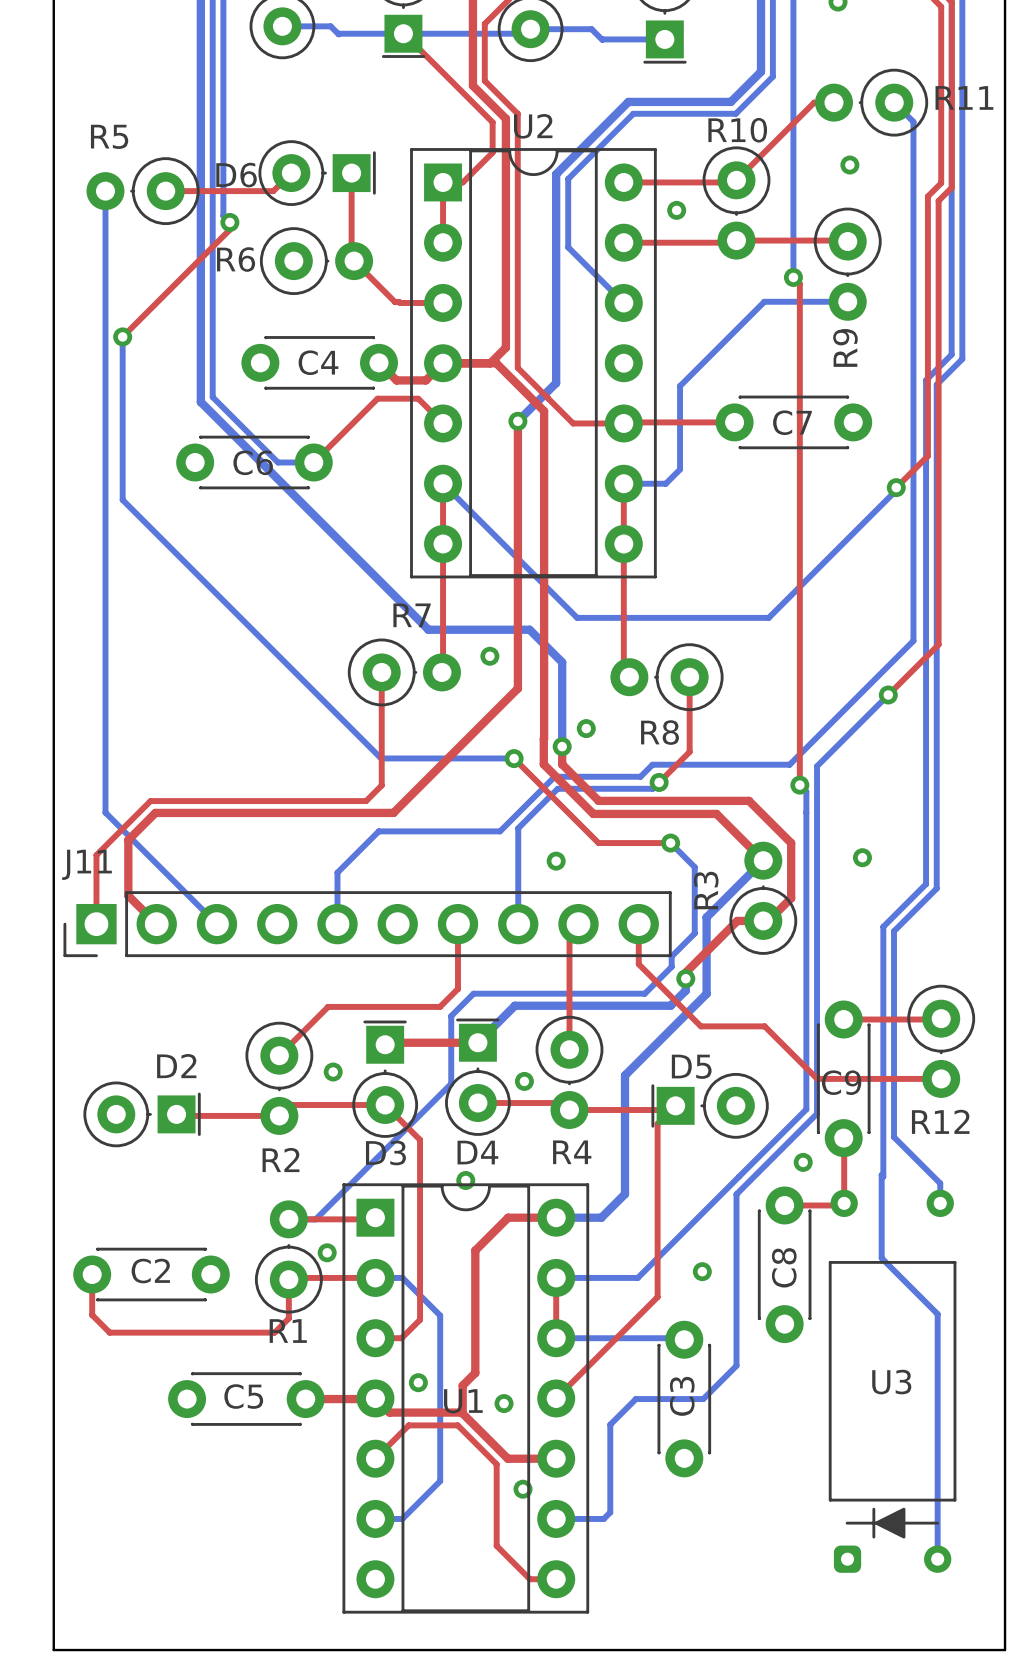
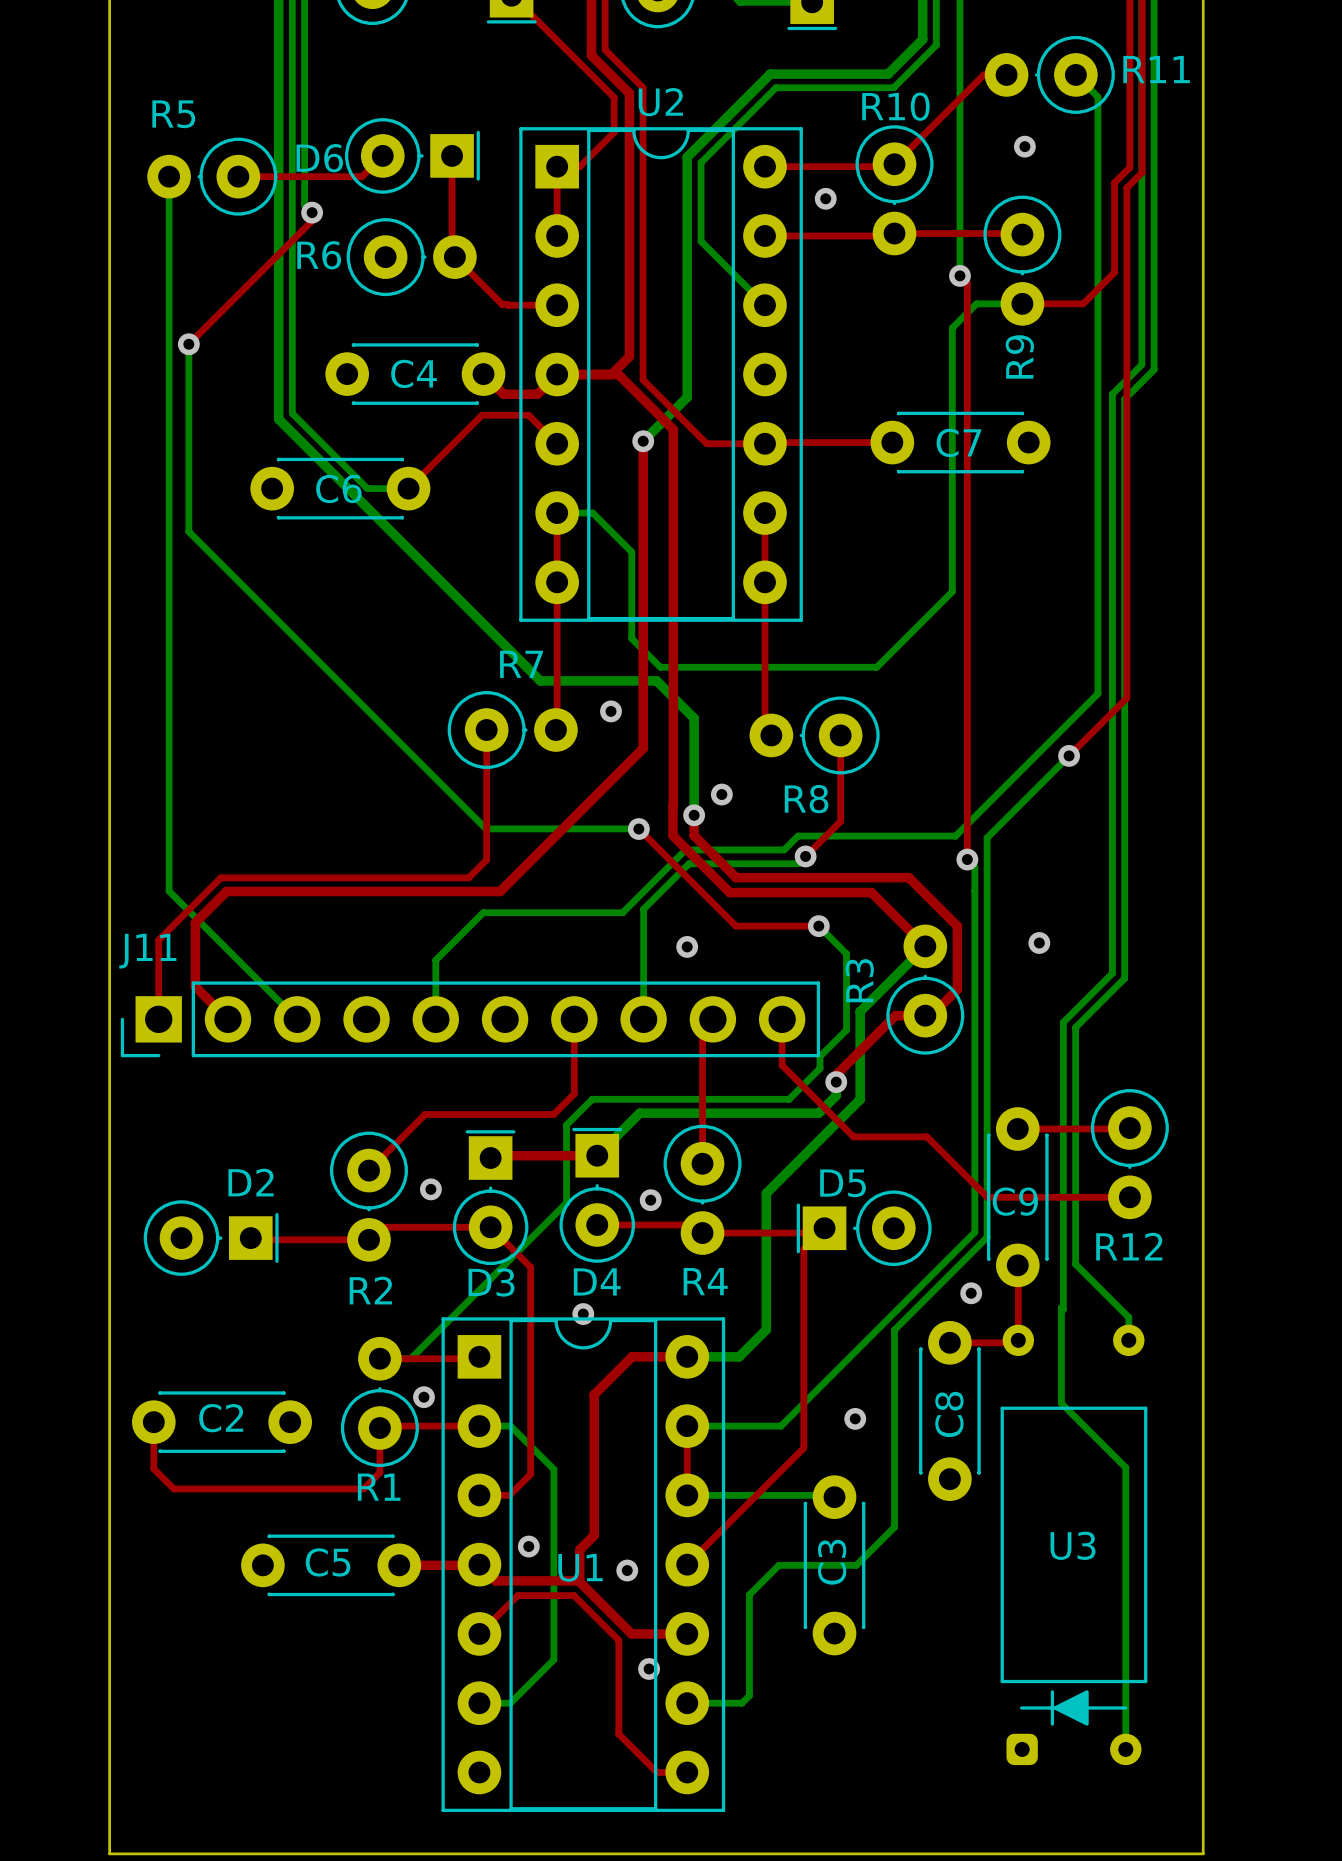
top track: (927, 274) (927, 455) (896, 487) -> (1114, 272) (1083, 303) (1022, 303)
bottom track: (807, 301) (764, 301) (680, 386) (680, 469) (665, 483) (623, 483) -> (976, 303) (952, 328) (952, 591) (876, 667)
bottom track: (443, 483) (577, 617) -> (557, 513) (592, 513) (631, 552) (631, 638) (660, 667) (711, 667)
bottom track: (896, 487) (896, 490) (768, 617) (721, 617) -> none
via: (896, 487) -> none

